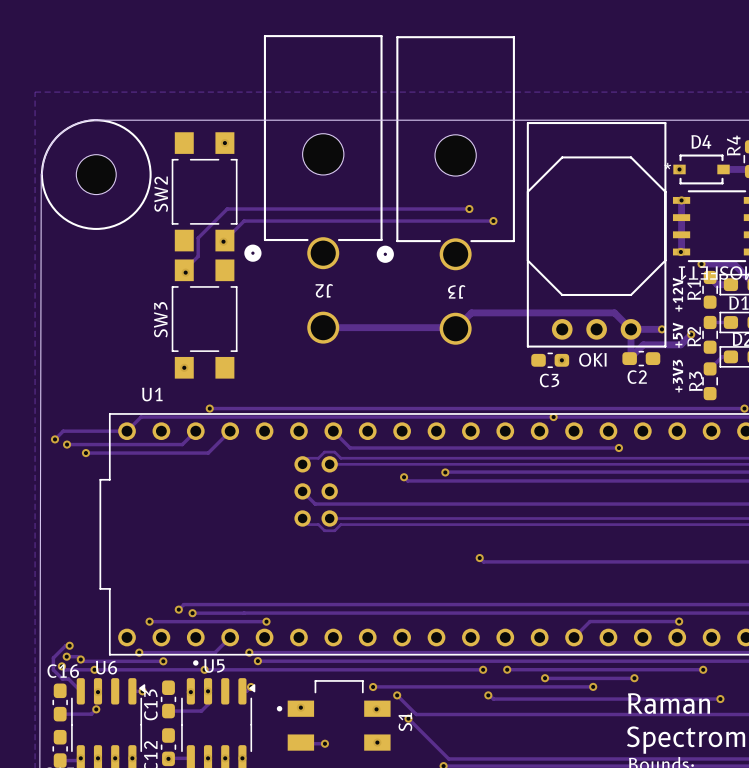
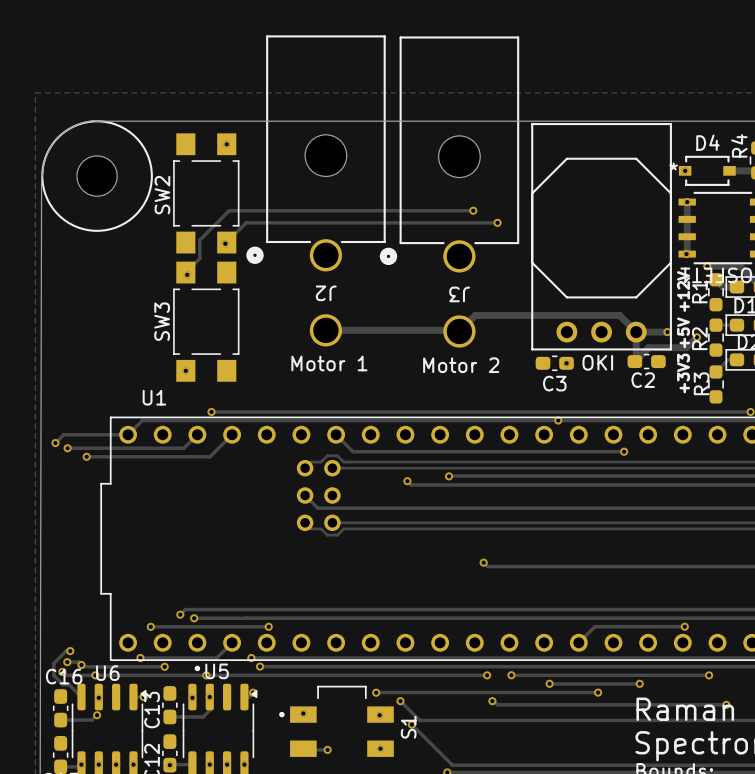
text: none -> Motor 1 (329, 363)
text: none -> Motor 2 (461, 365)

